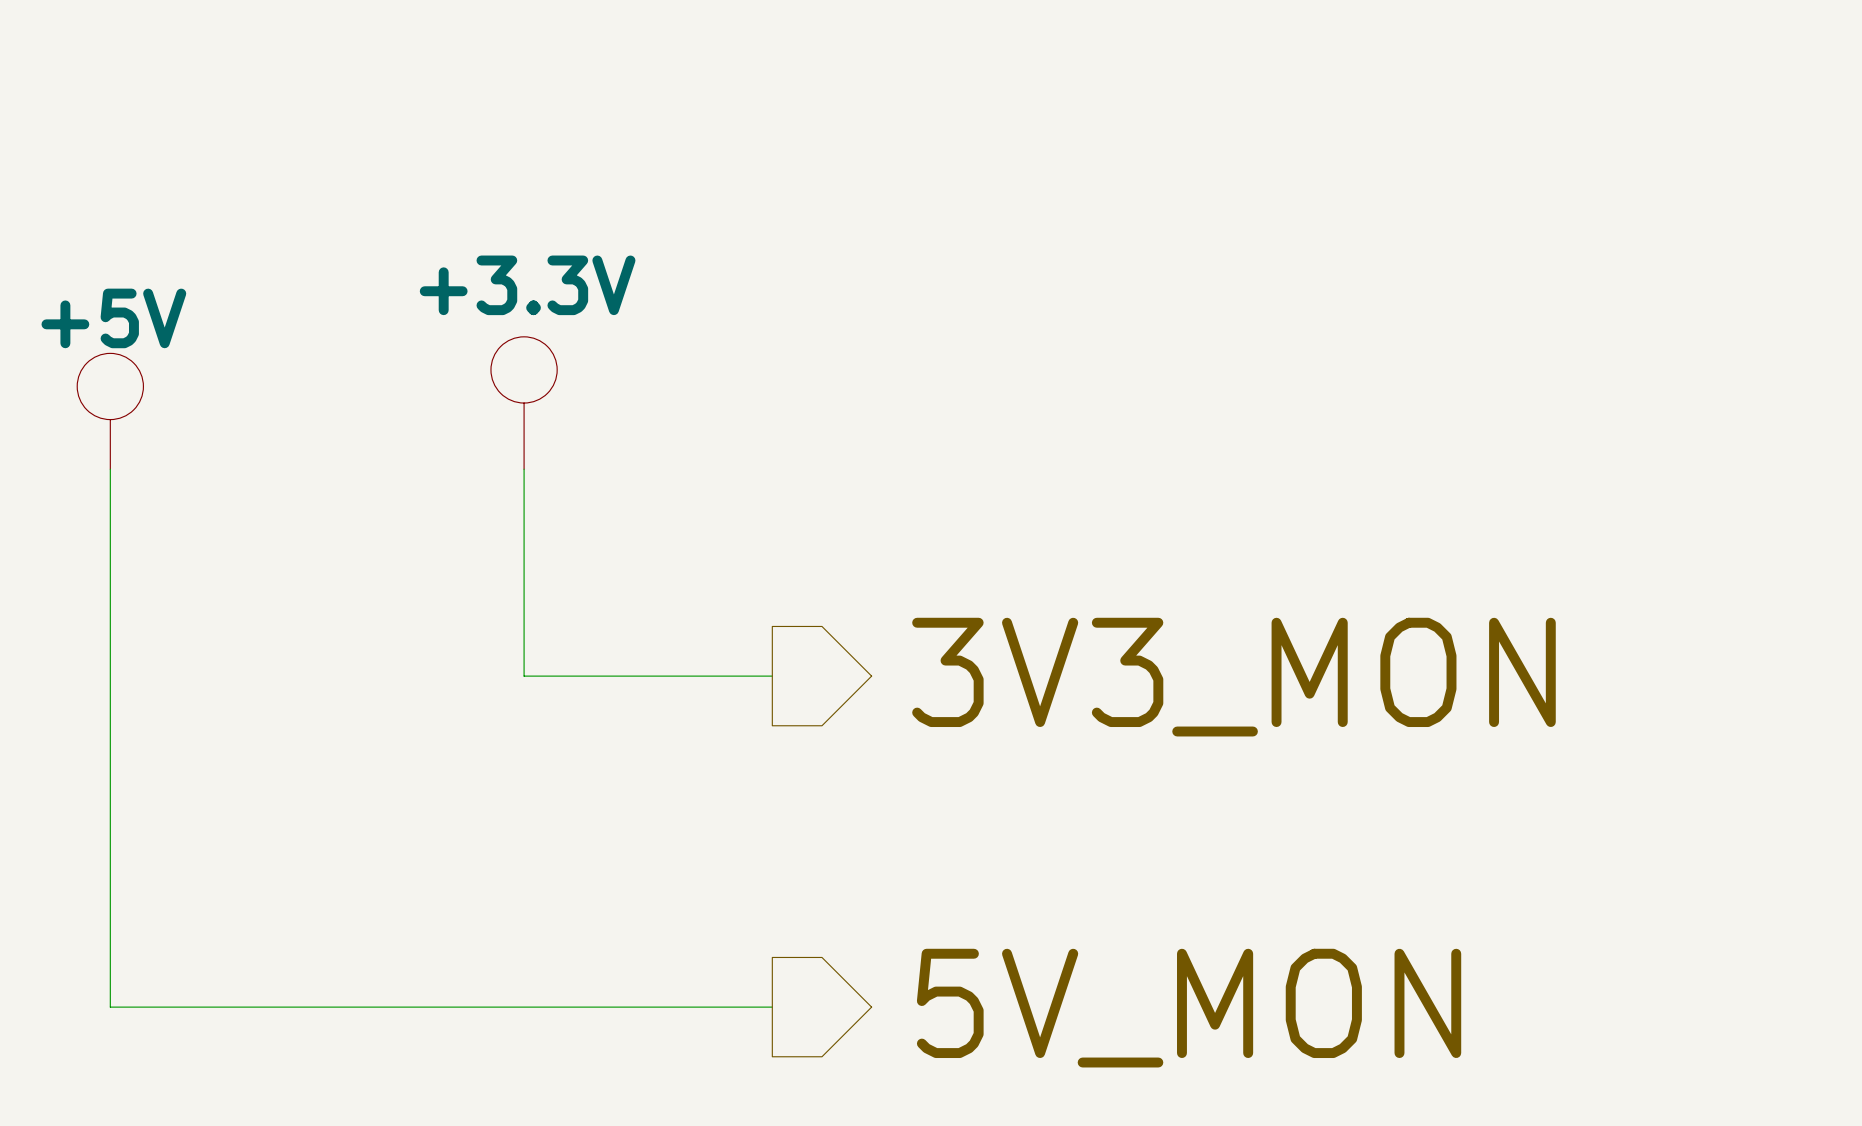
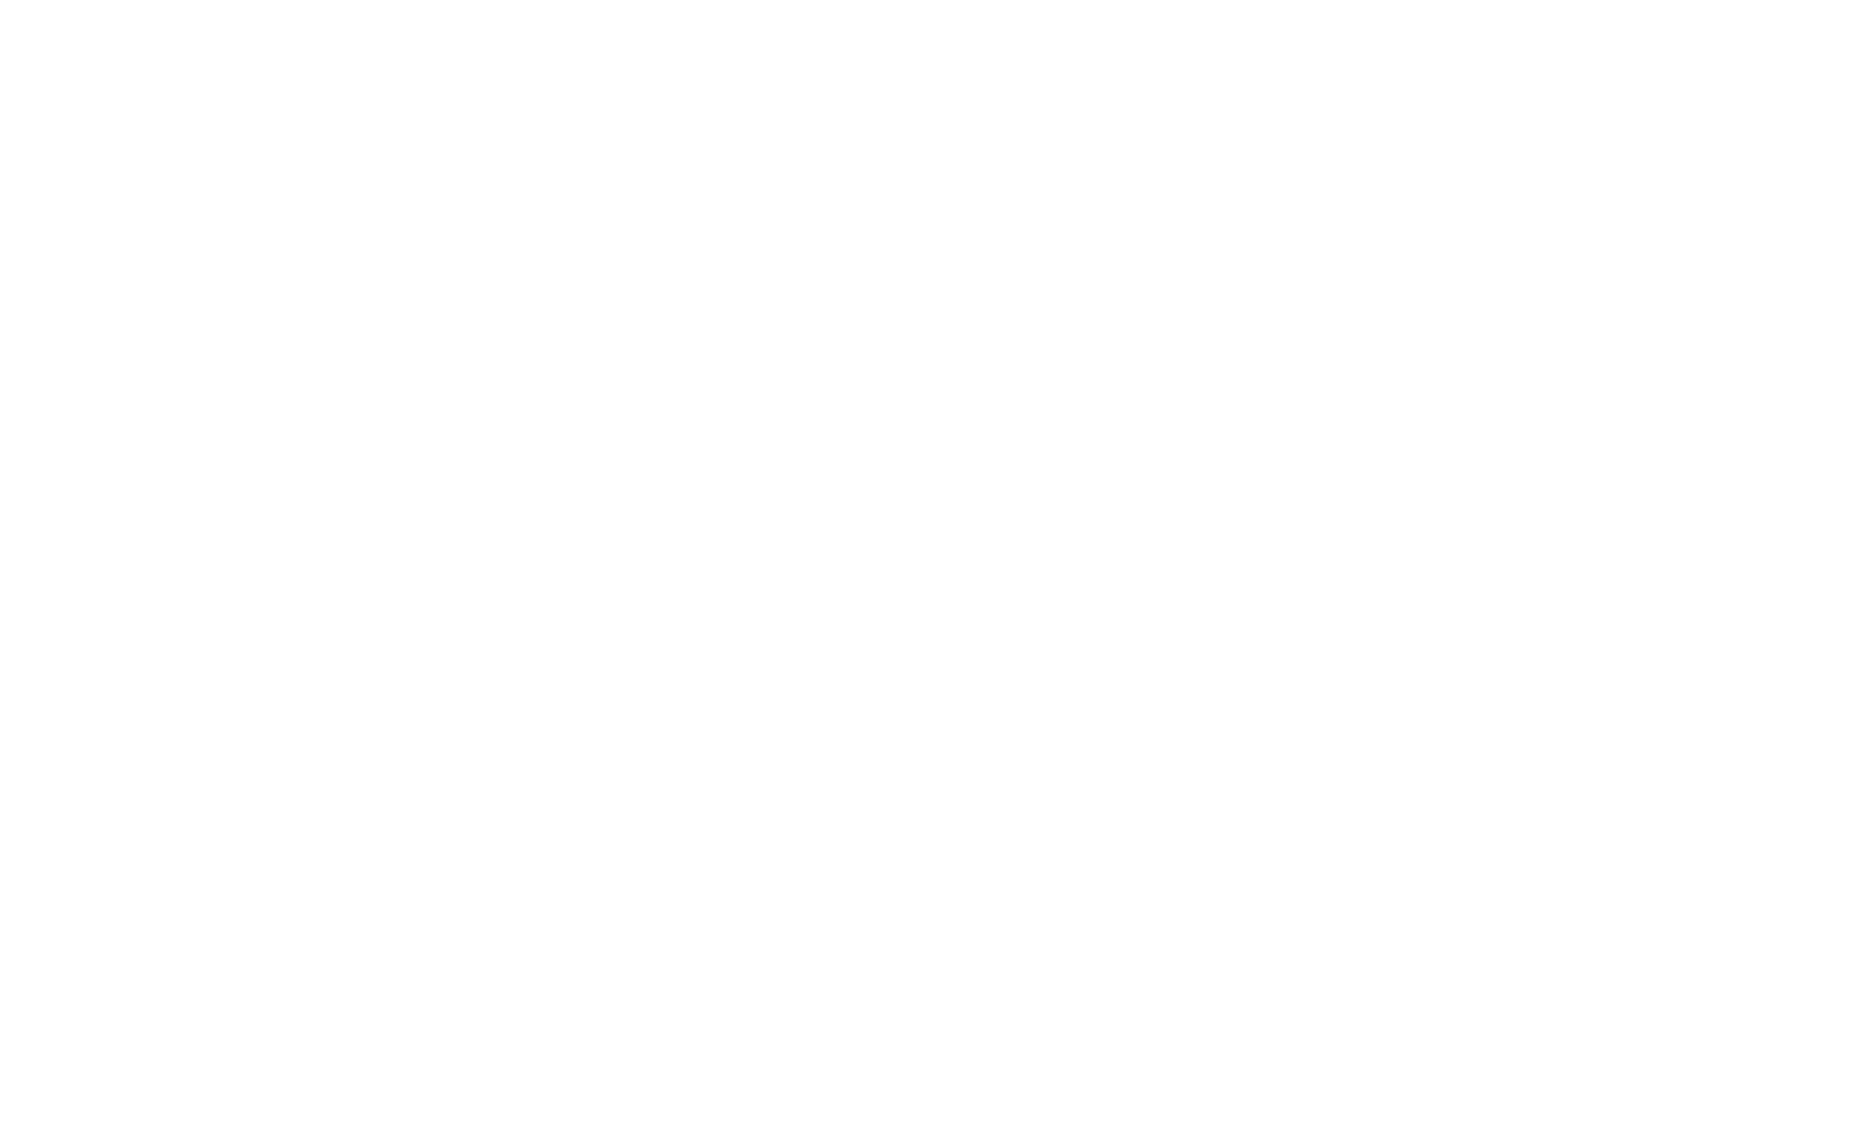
power symbol: +3.3V (524, 403) -> none
power symbol: +5V (110, 411) -> none
wire: (110, 469) (110, 1007) (772, 1007) -> none
wire: (524, 469) (524, 676) (772, 676) -> none
hierarchical label: 3V3_MON (1233, 677) -> none
hierarchical label: 5V_MON (1189, 1008) -> none

